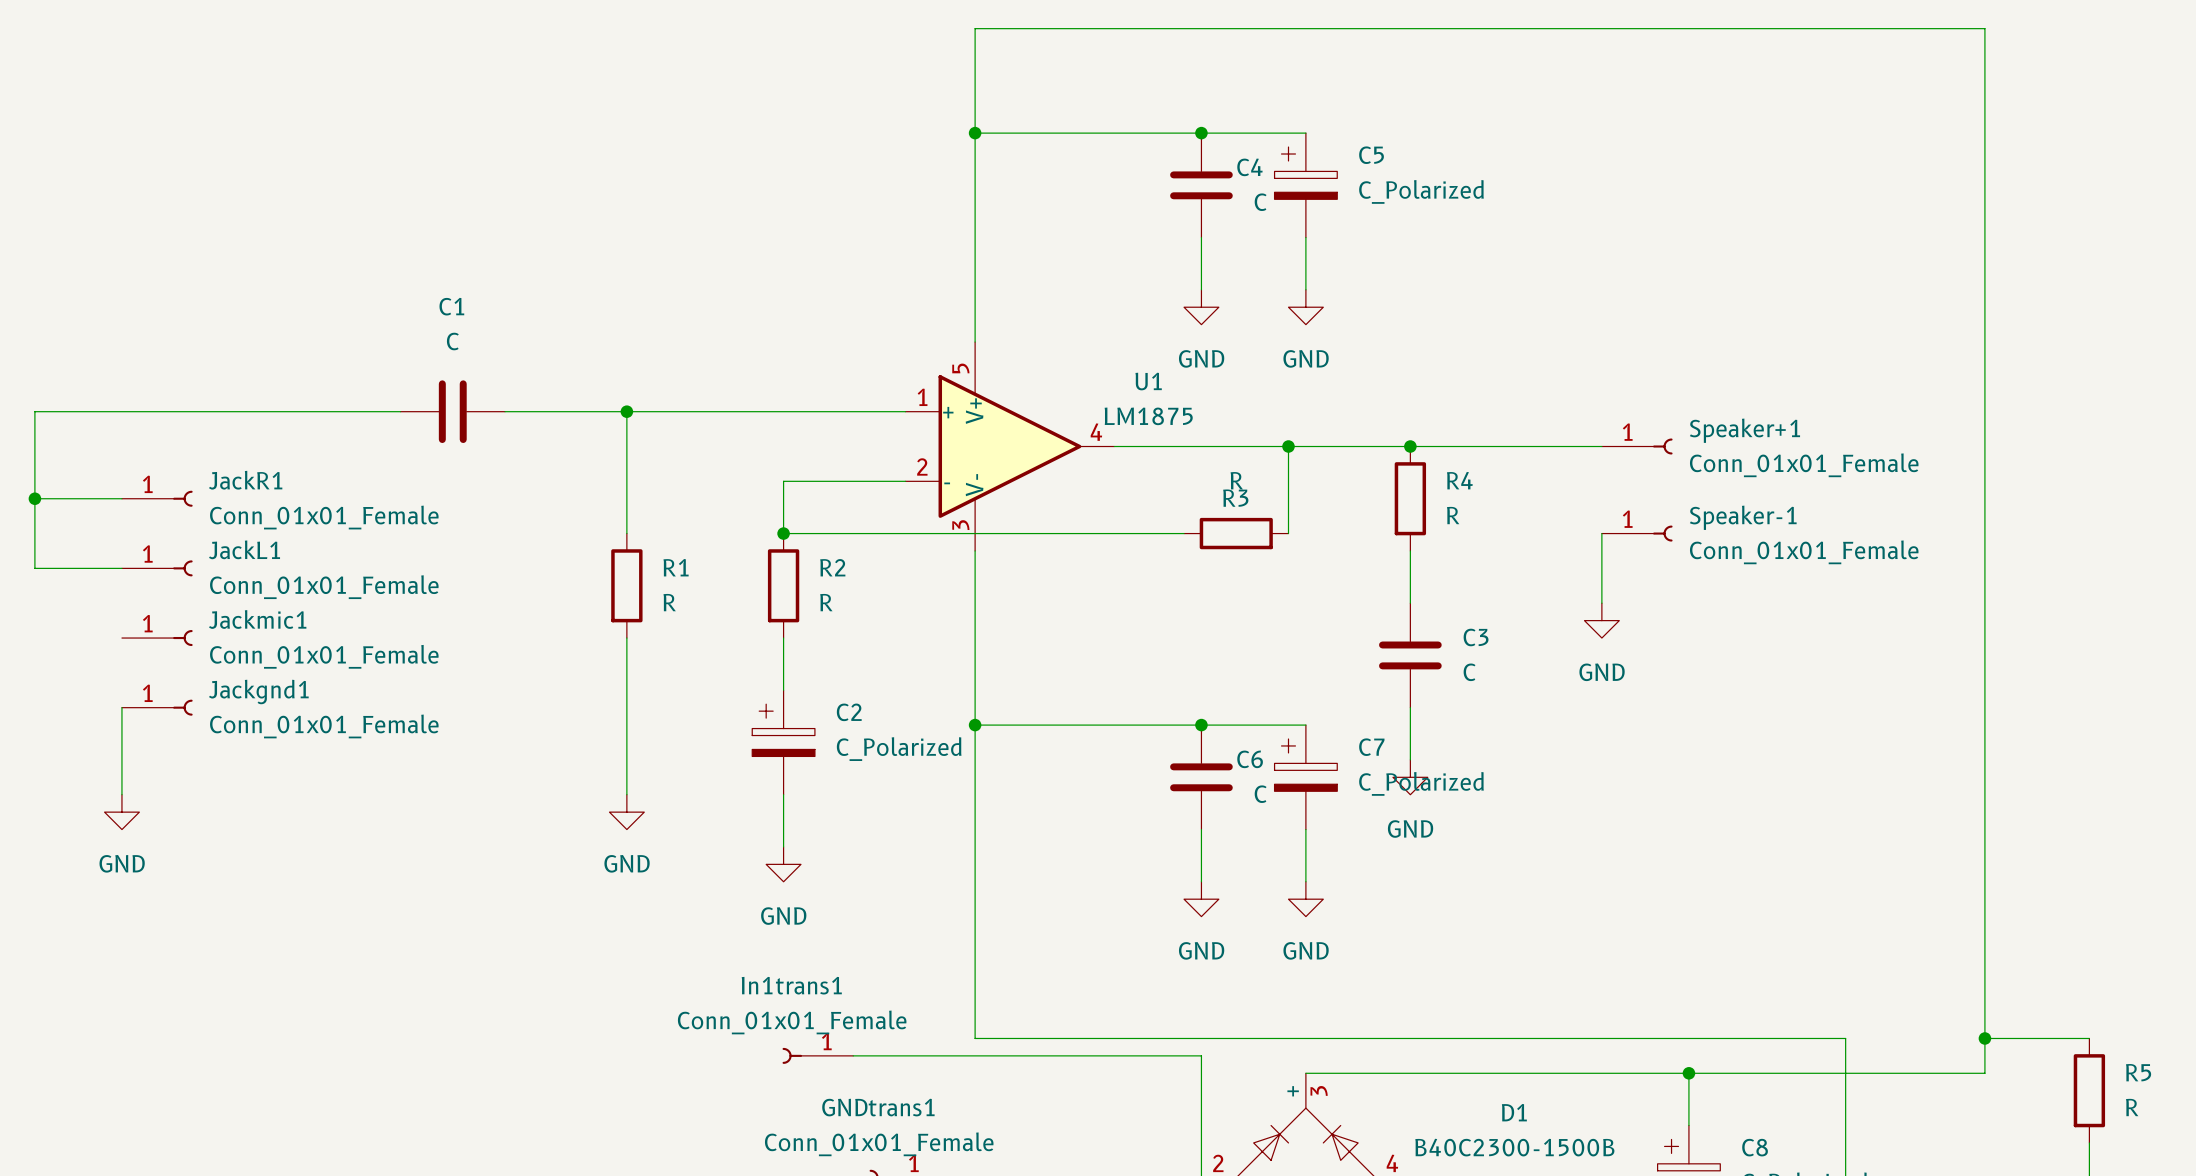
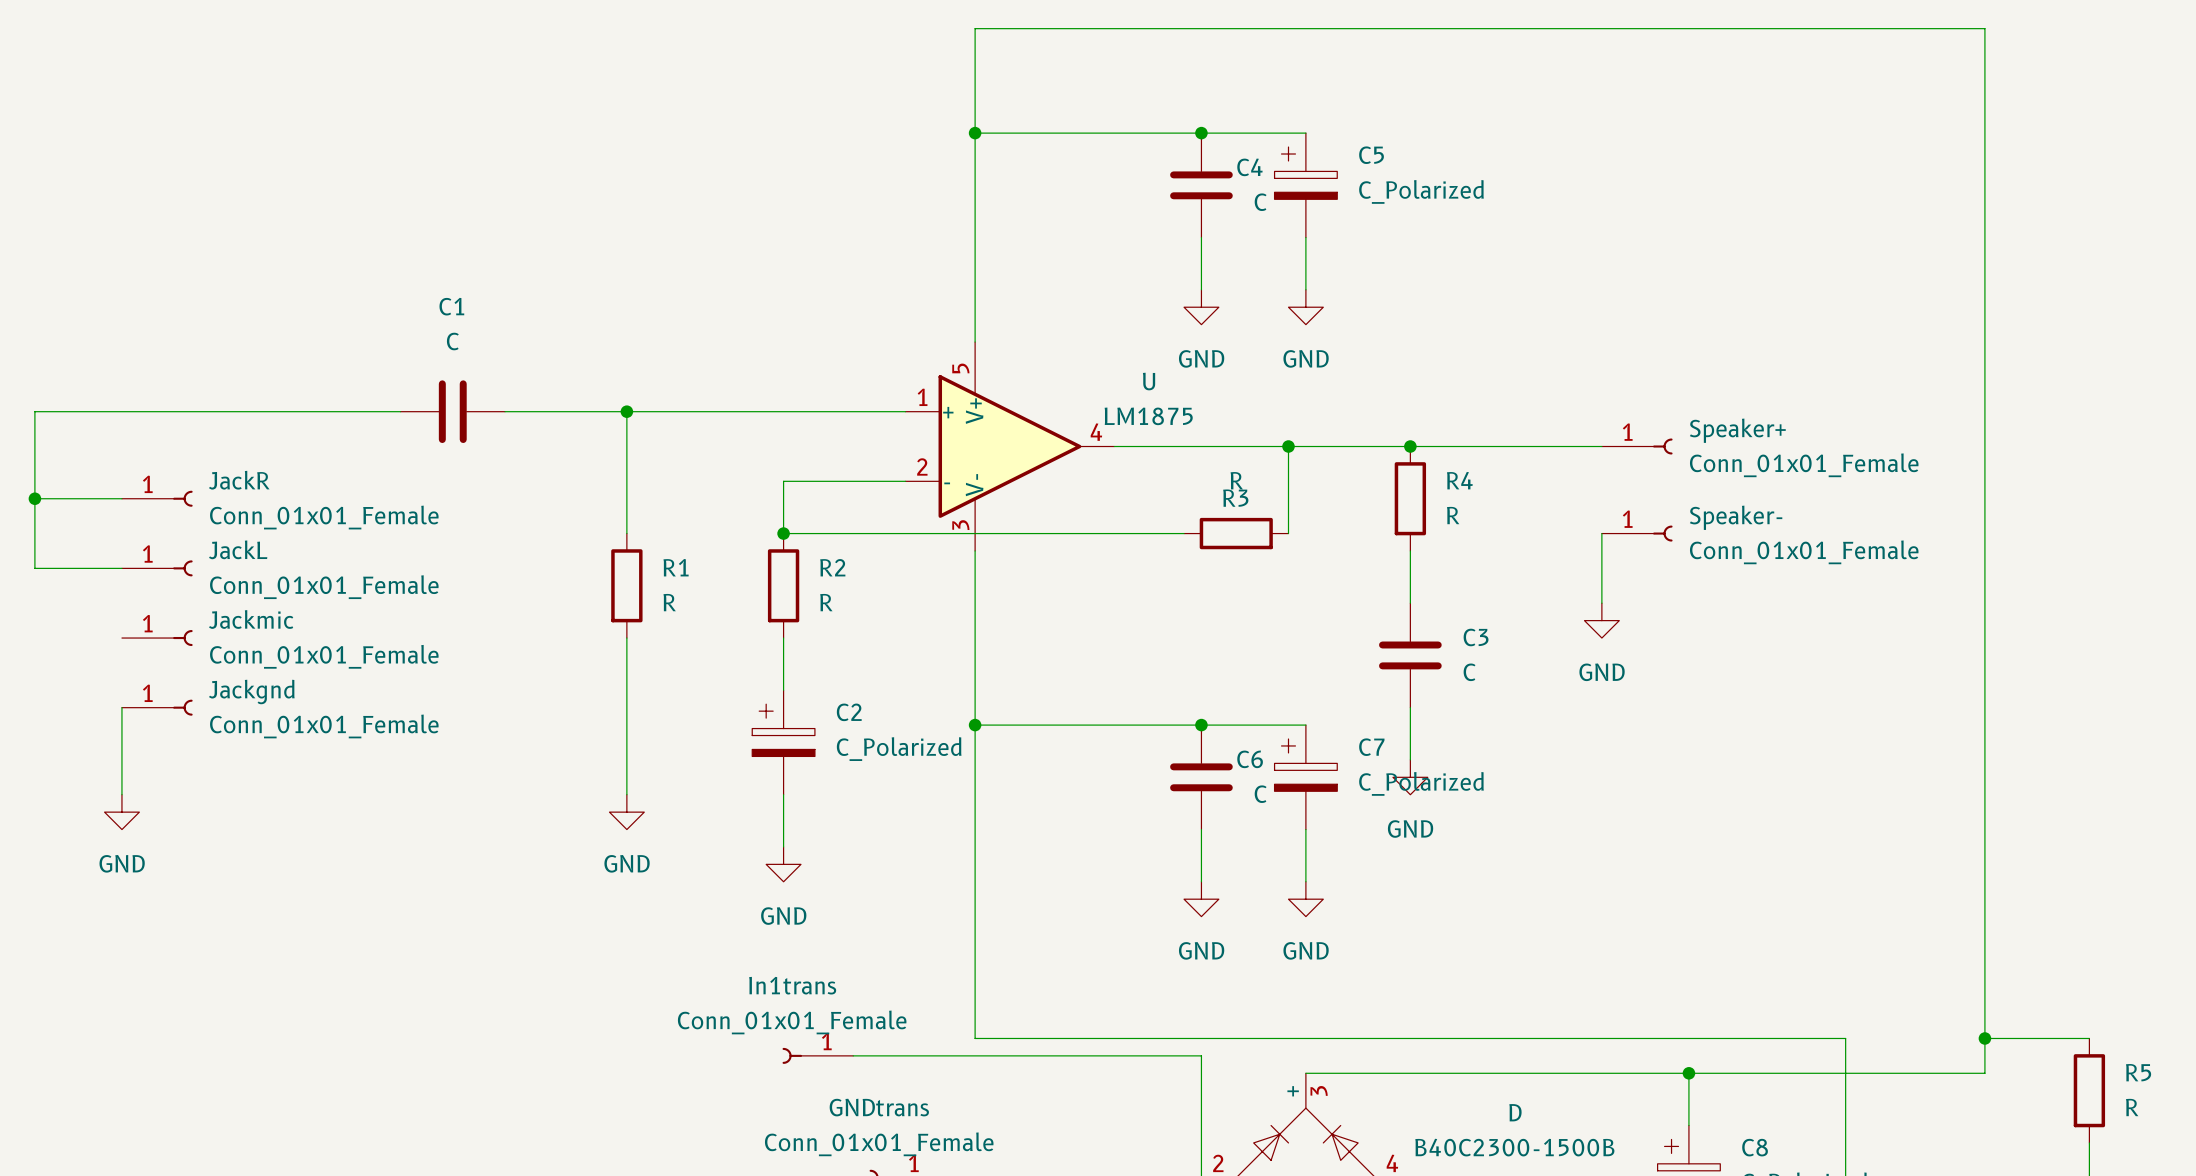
U1 name: U1 (1148, 381) -> U (1149, 381)
Speaker+1 name: Speaker+1 (1744, 430) -> Speaker+ (1737, 430)
JackR1 name: JackR1 (245, 480) -> JackR (239, 480)
Speaker-1 name: Speaker-1 (1743, 517) -> Speaker- (1736, 517)
JackL1 name: JackL1 (244, 549) -> JackL (238, 549)
Jackmic1 name: Jackmic1 (257, 619) -> Jackmic (251, 619)
Jackgnd1 name: Jackgnd1 (258, 691) -> Jackgnd (251, 691)
In1trans1 name: In1trans1 (791, 985) -> In1trans (792, 985)
GNDtrans1 name: GNDtrans1 (878, 1107) -> GNDtrans (879, 1107)
D1 name: D1 (1514, 1112) -> D (1515, 1112)

